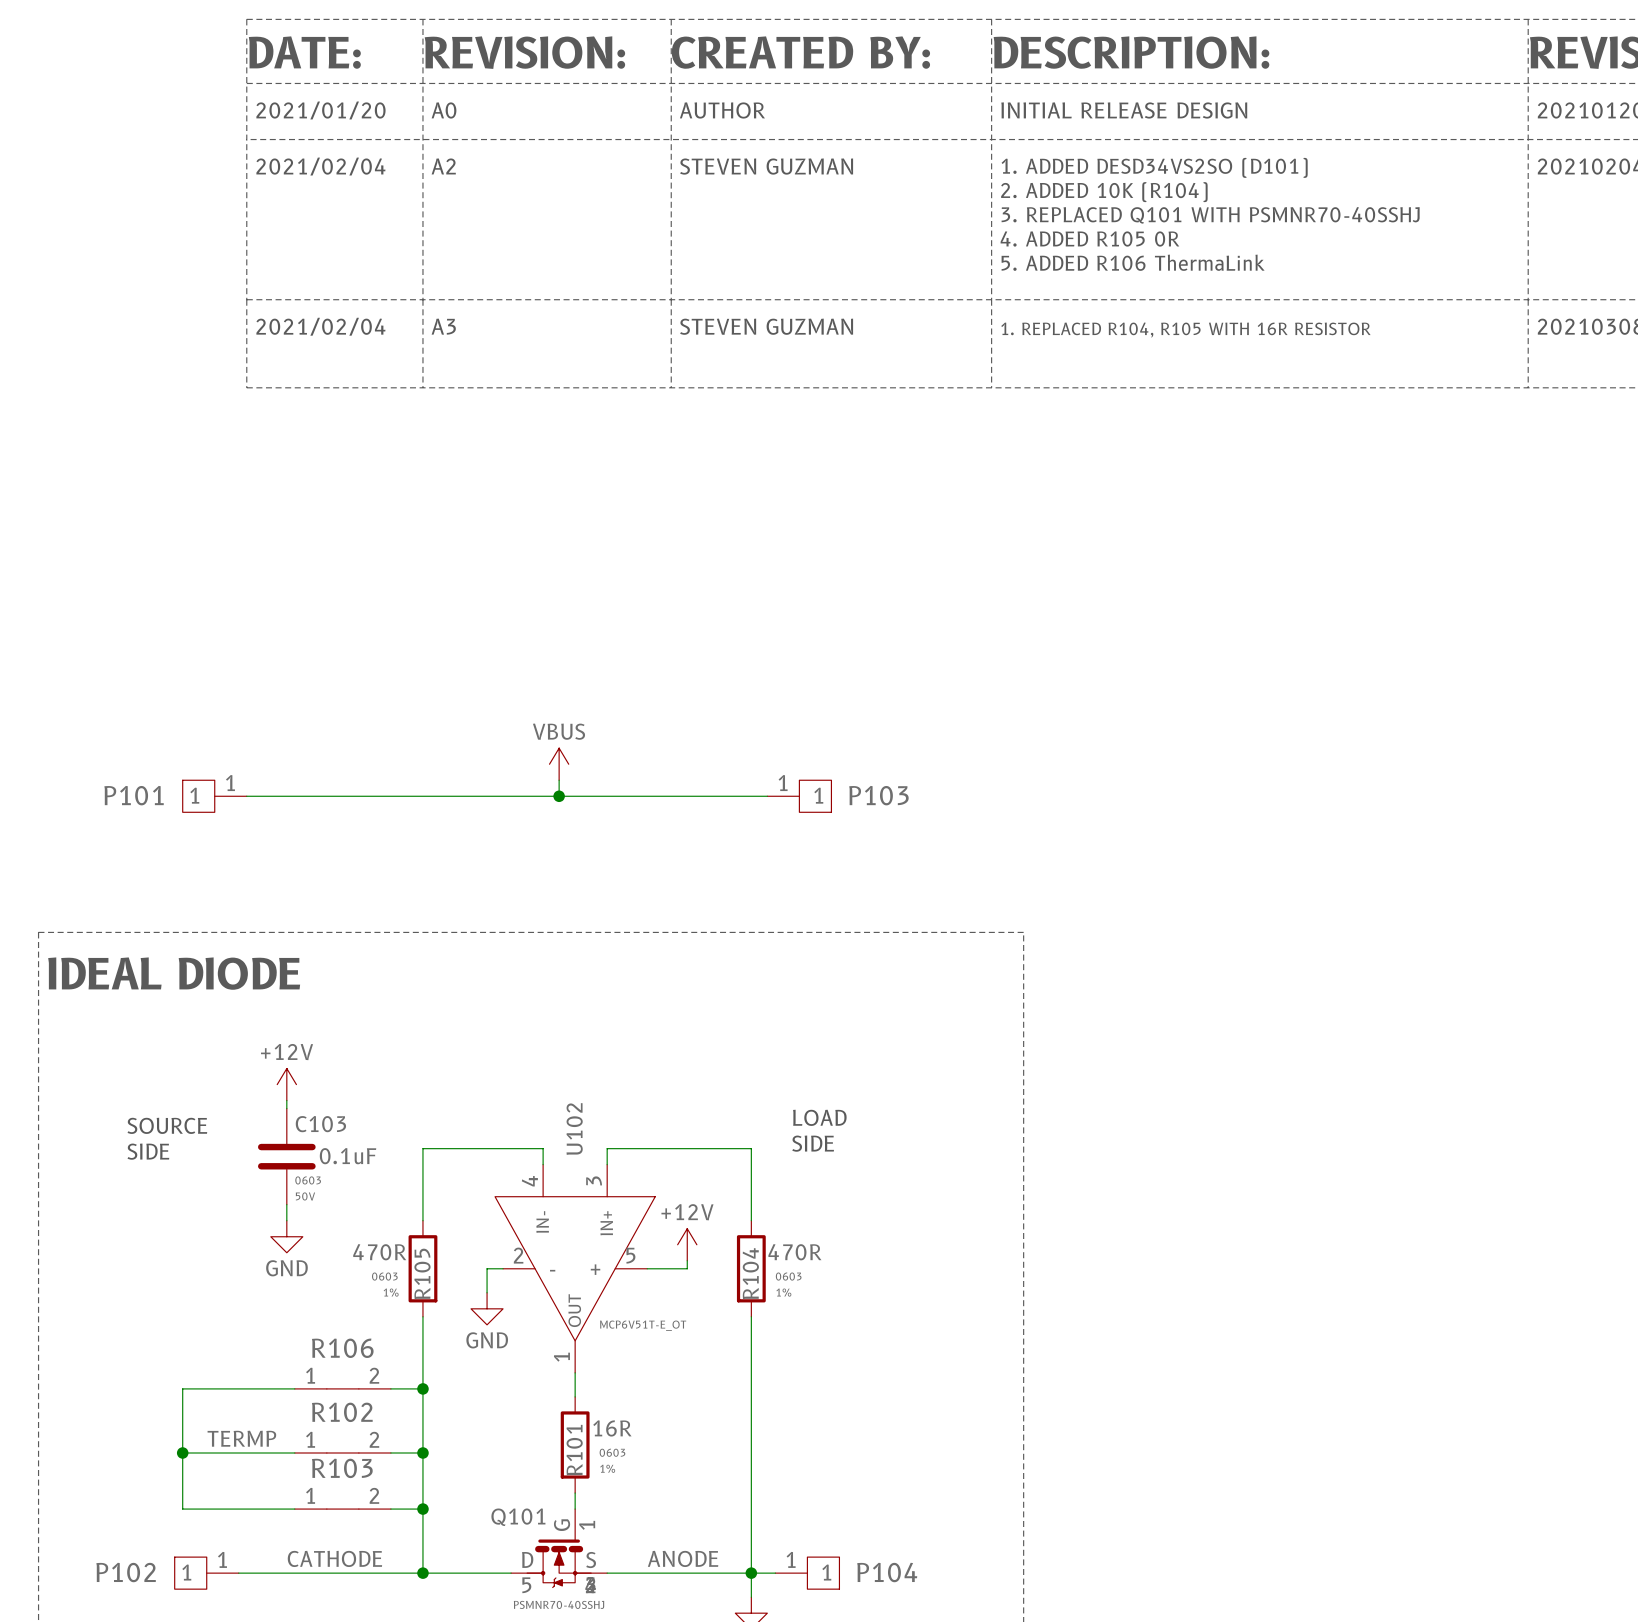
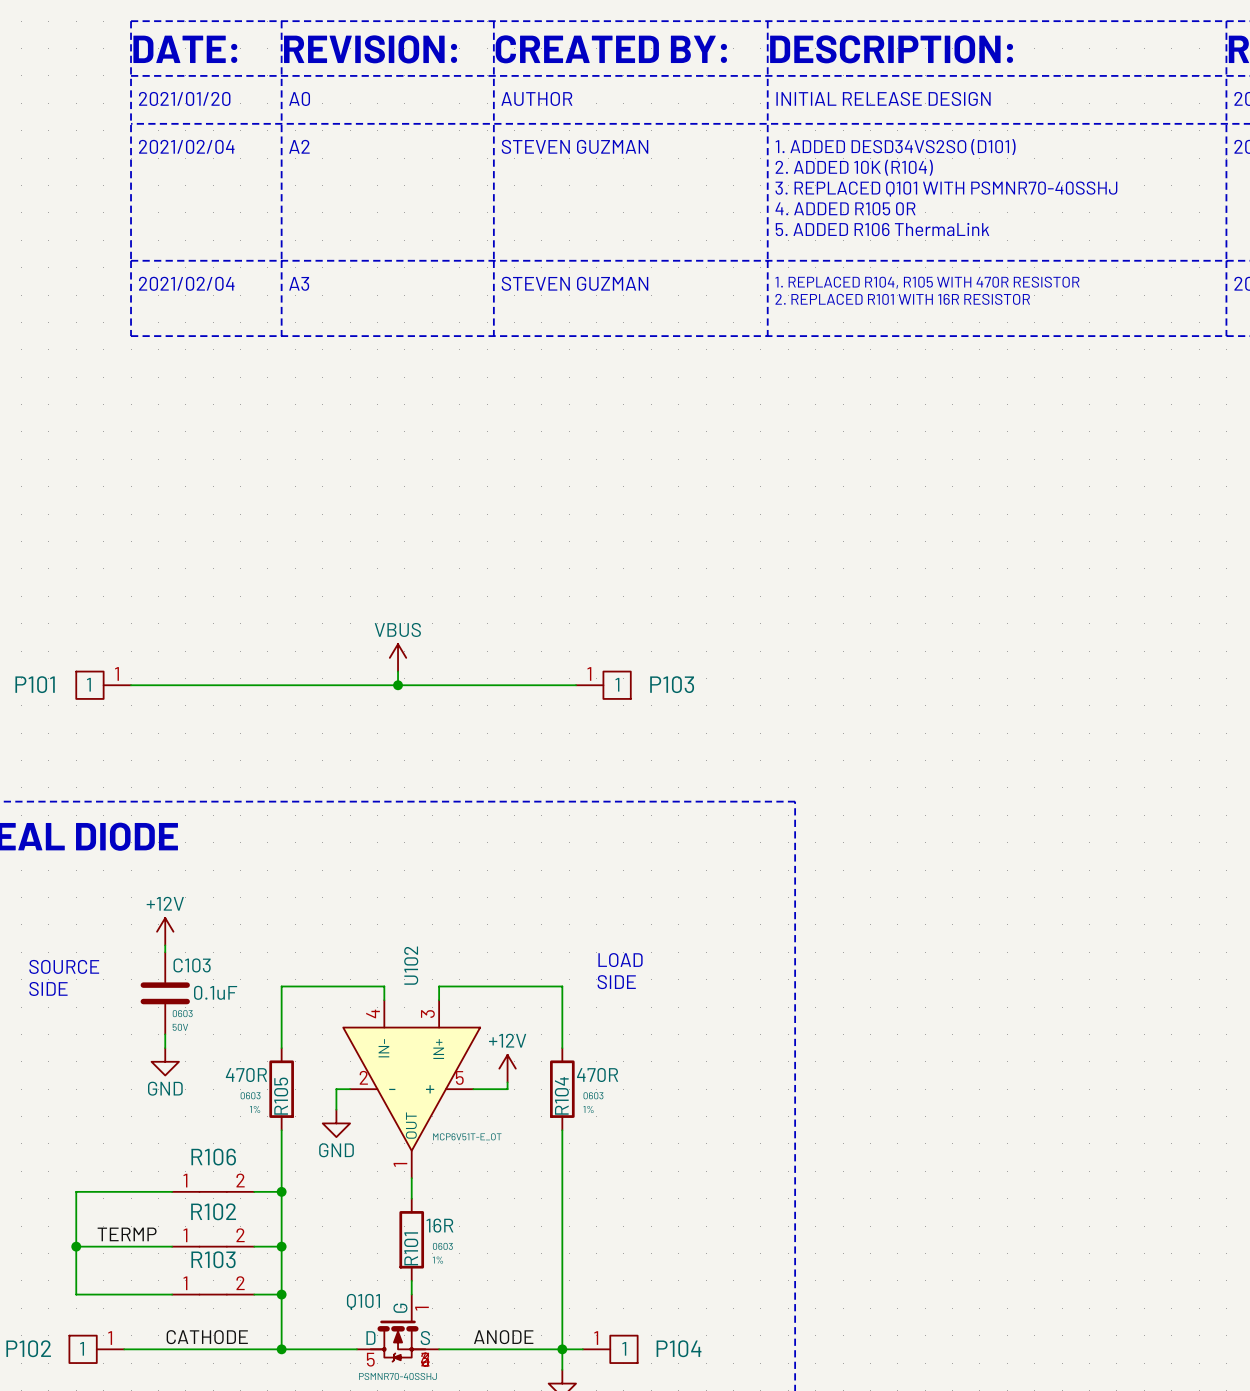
text: 1. REPLACED R104, R105 WITH 16R RESISTOR (1185, 330) -> 1. REPLACED R104, R105 WITH 470R RESISTOR (927, 282)
text: none -> 2. REPLACED R101 WITH 16R RESISTOR (902, 299)

